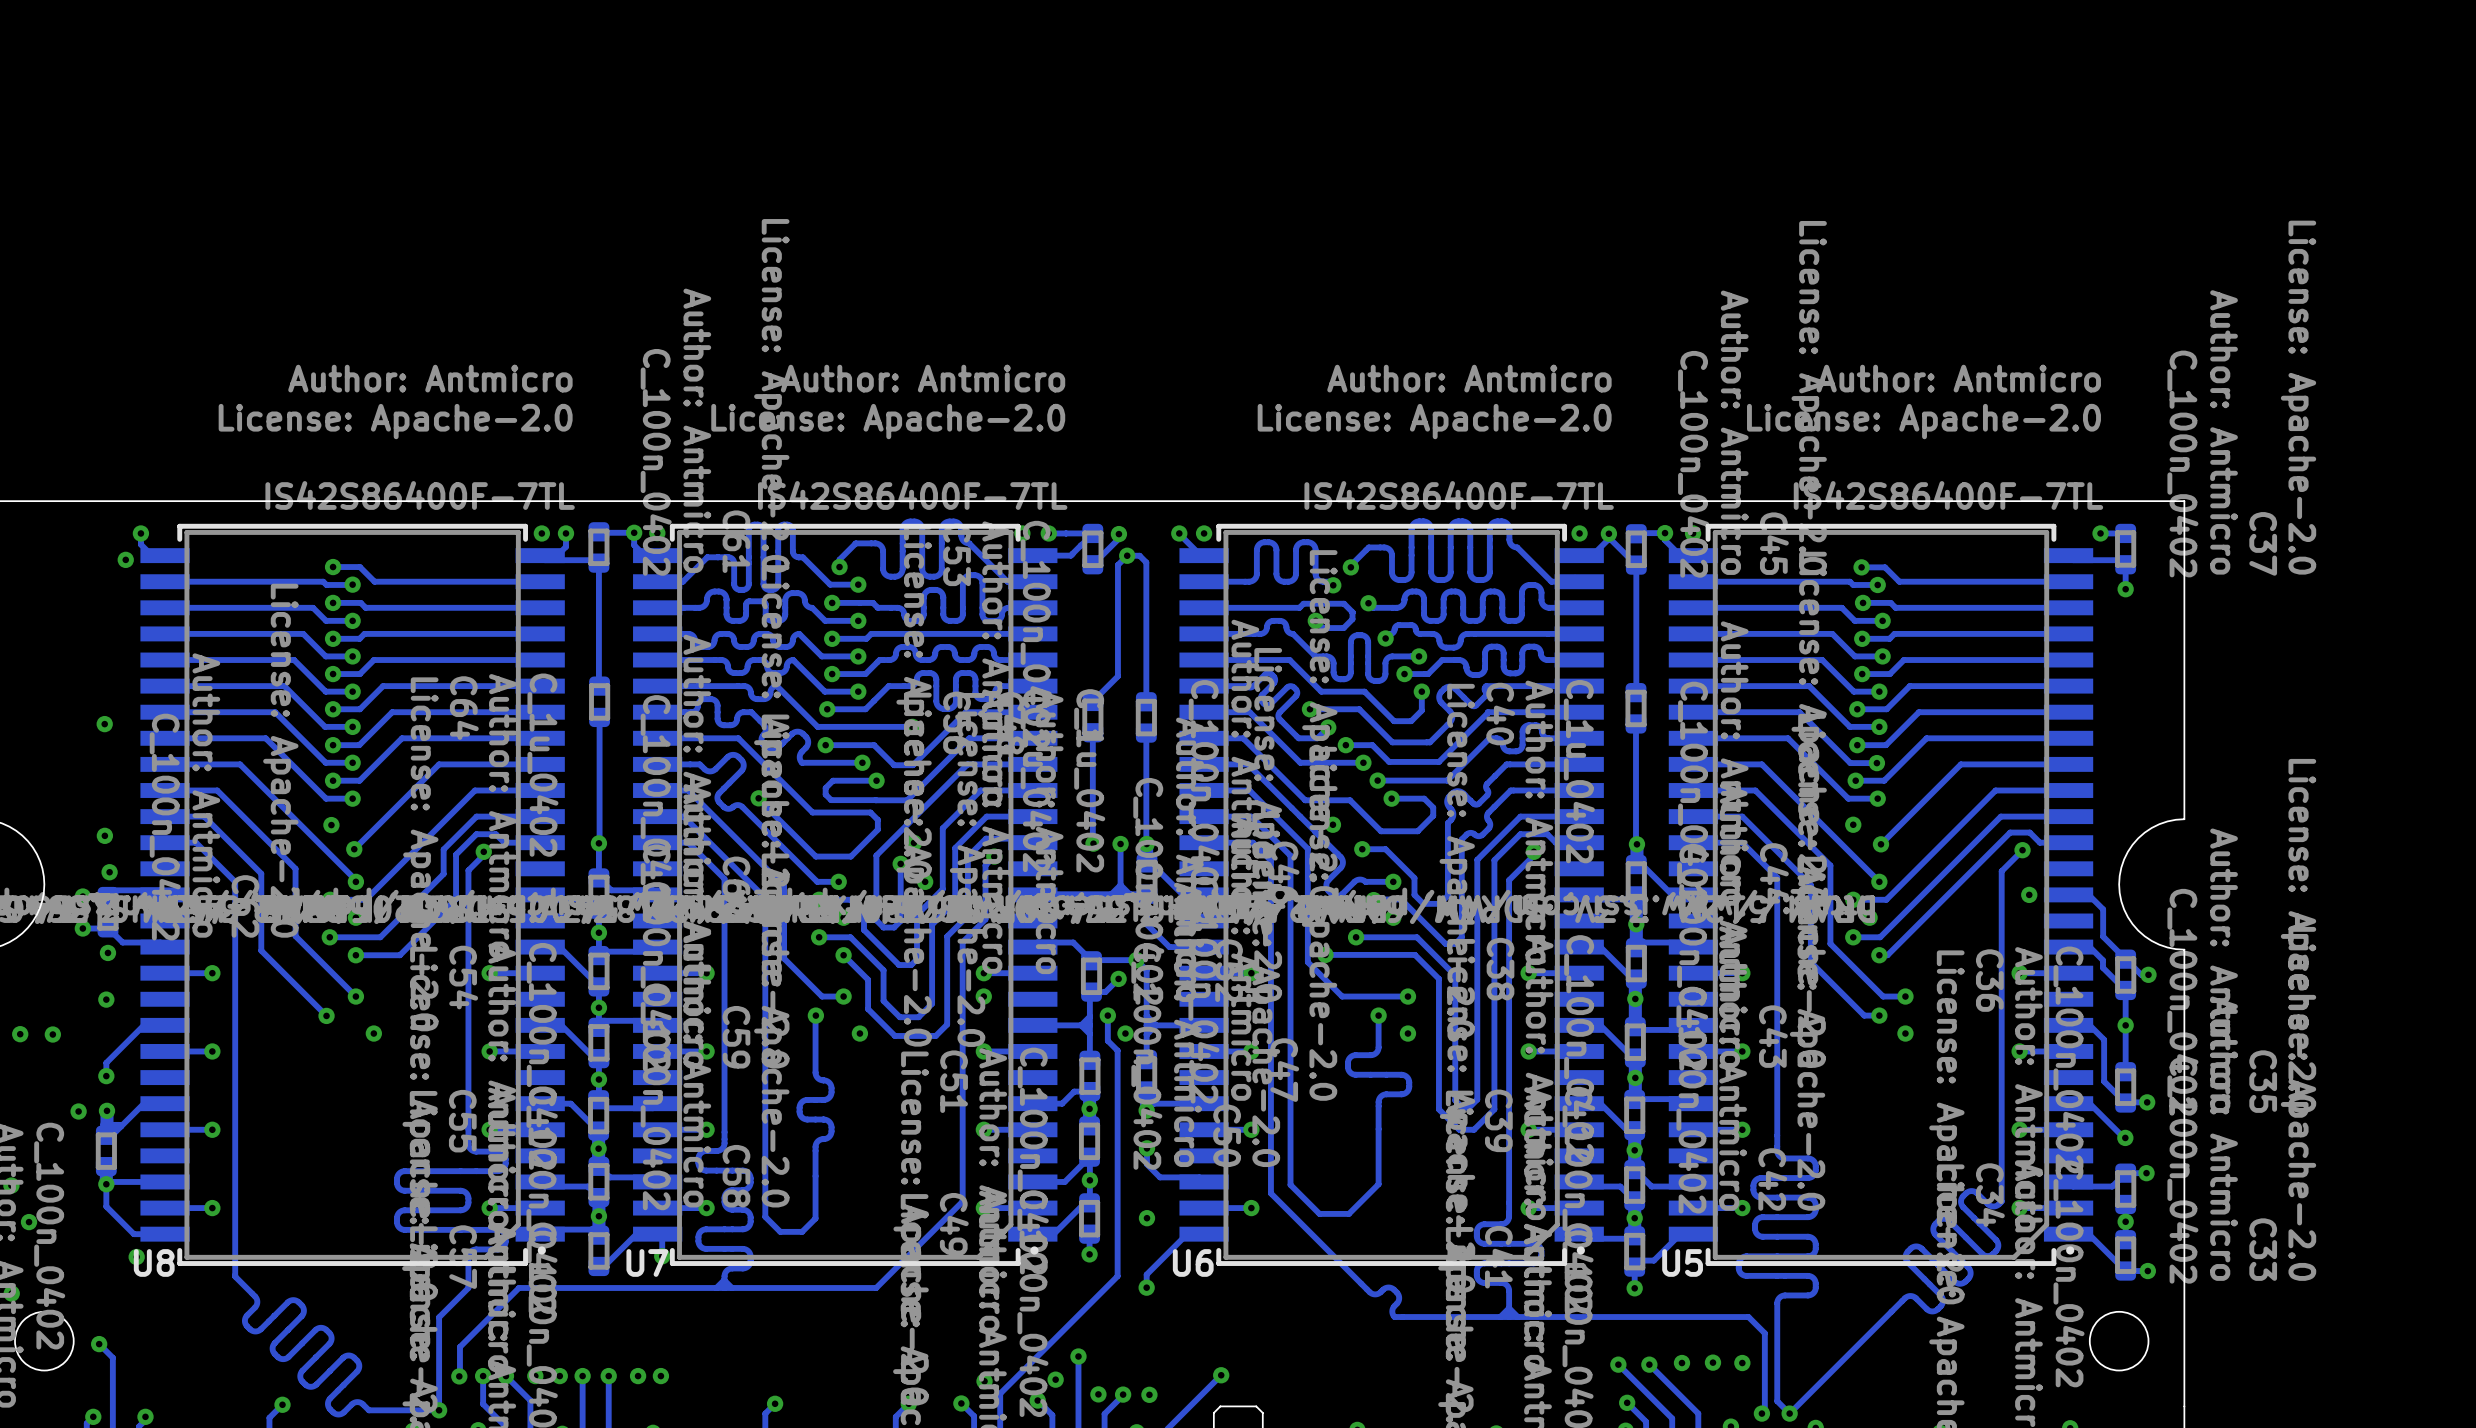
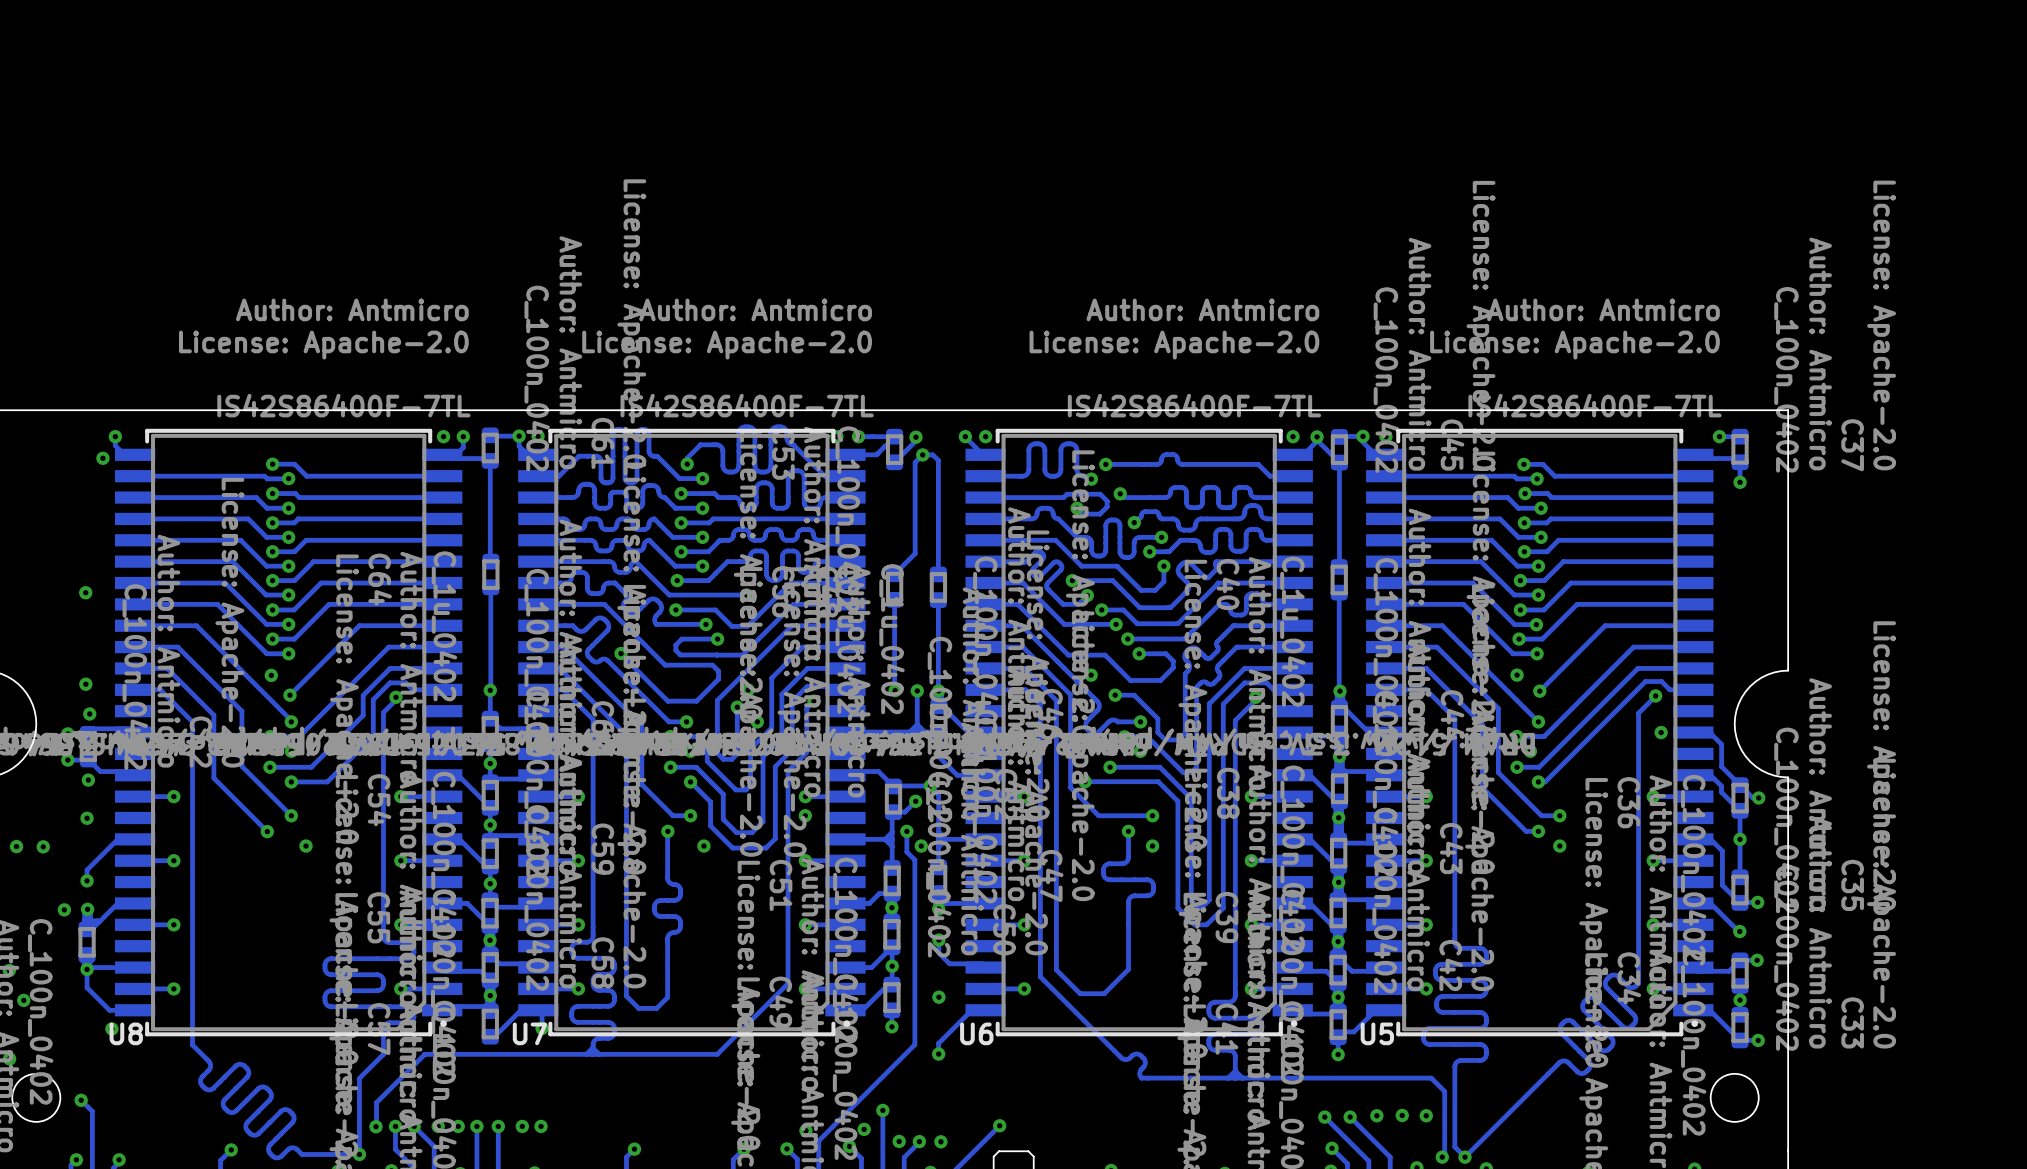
track: (1537, 567) (1517, 547) (1511, 544) (1508, 526) (1501, 521) (1494, 522) (1490, 526) (1489, 573) (1484, 579) (1475, 579) (1470, 574) (1470, 528) (1467, 523) (1463, 521) (1455, 522) (1451, 526) (1450, 573) (1445, 579) (1436, 579) (1431, 574) (1431, 528) (1428, 523) (1424, 521) (1415, 522) (1411, 527) (1411, 573) (1407, 578) (1398, 580) (1393, 576) (1391, 553) (1385, 547) (1368, 547) (1350, 567) -> (1258, 464) (1182, 464) (1178, 462) (1176, 456) (1172, 454) (1163, 455) (1160, 462) (1157, 464) (1105, 464)
track: (1404, 599) (1408, 592) (1420, 592) (1423, 597) (1424, 617) (1428, 620) (1437, 620) (1443, 616) (1444, 595) (1449, 591) (1457, 591) (1462, 597) (1464, 617) (1468, 620) (1477, 620) (1482, 616) (1483, 595) (1488, 591) (1496, 591) (1502, 597) (1503, 618) (1508, 620) (1516, 620) (1521, 616) (1522, 589) (1527, 585) (1534, 585) (1540, 589) (1542, 604) (1549, 607) -> (1143, 497) (1166, 497) (1172, 488) (1182, 487) (1186, 491) (1186, 504) (1191, 507) (1201, 505) (1202, 491) (1206, 487) (1217, 489) (1218, 503) (1222, 507) (1233, 505) (1234, 491) (1238, 487) (1248, 488) (1254, 497) (1268, 497)
track: (1404, 599) (1402, 605) (1396, 607) -> (1244, 512) (1242, 517) (1238, 518)
track: none -> (1260, 511) (1258, 507) (1254, 505) (1247, 506) (1244, 511)
track: (1548, 633) (1512, 633) -> (1267, 518) (1262, 517) (1260, 512)

